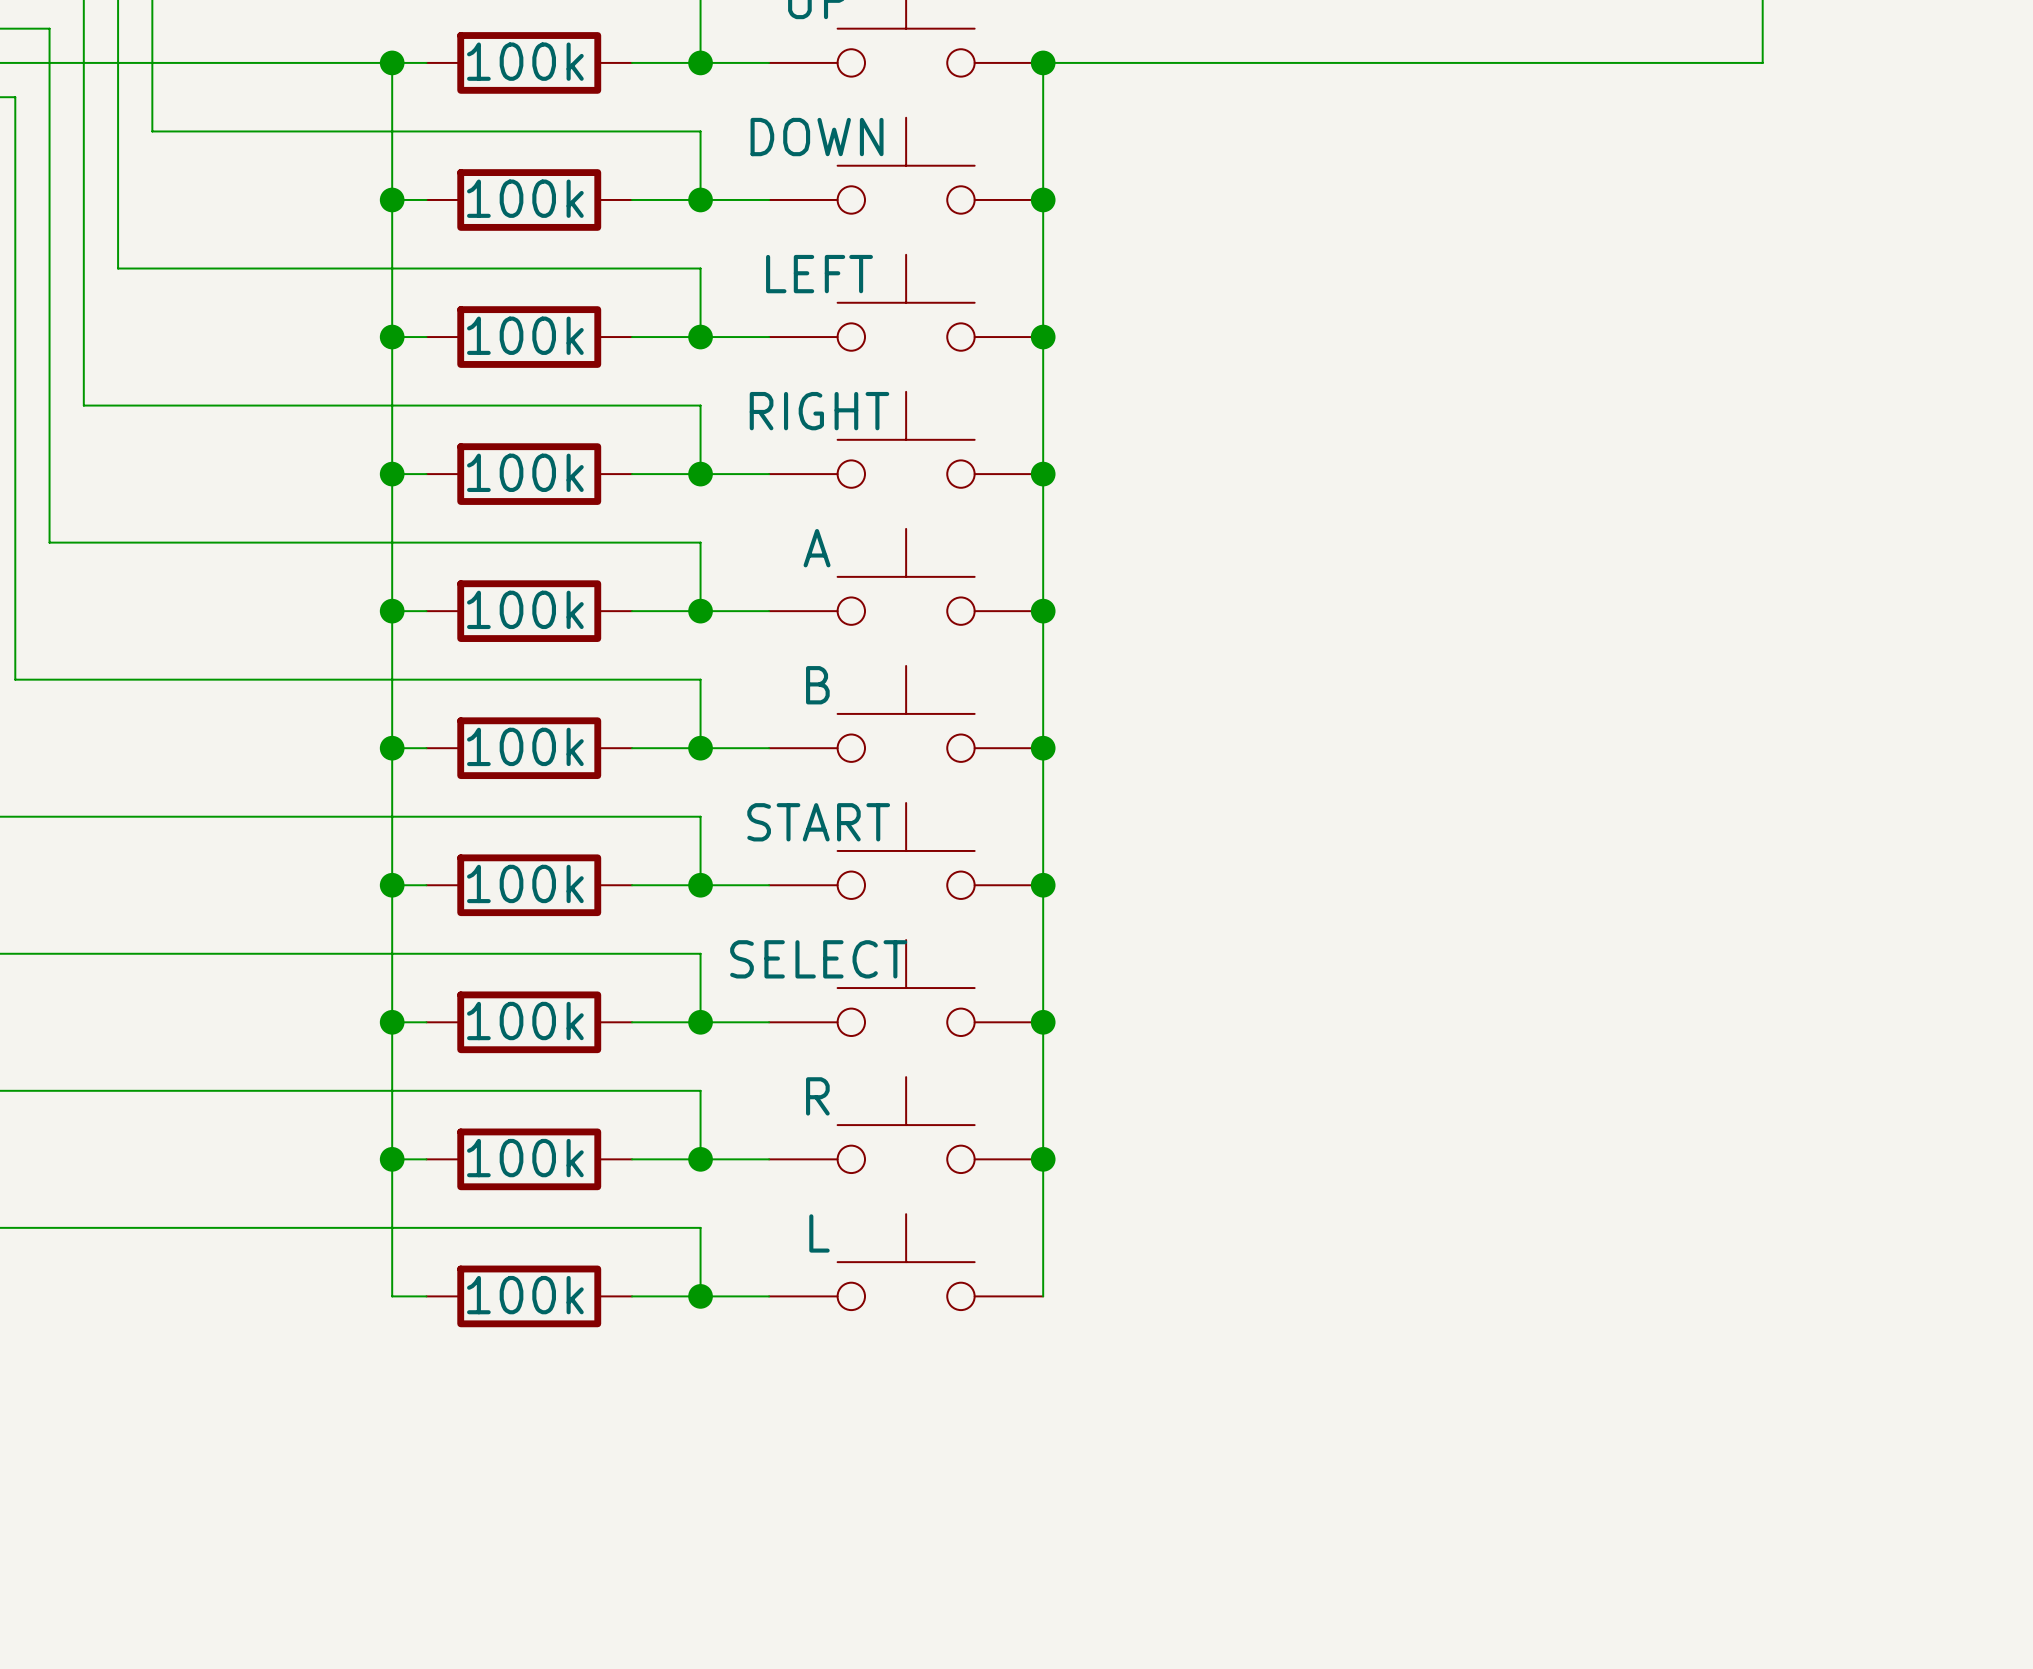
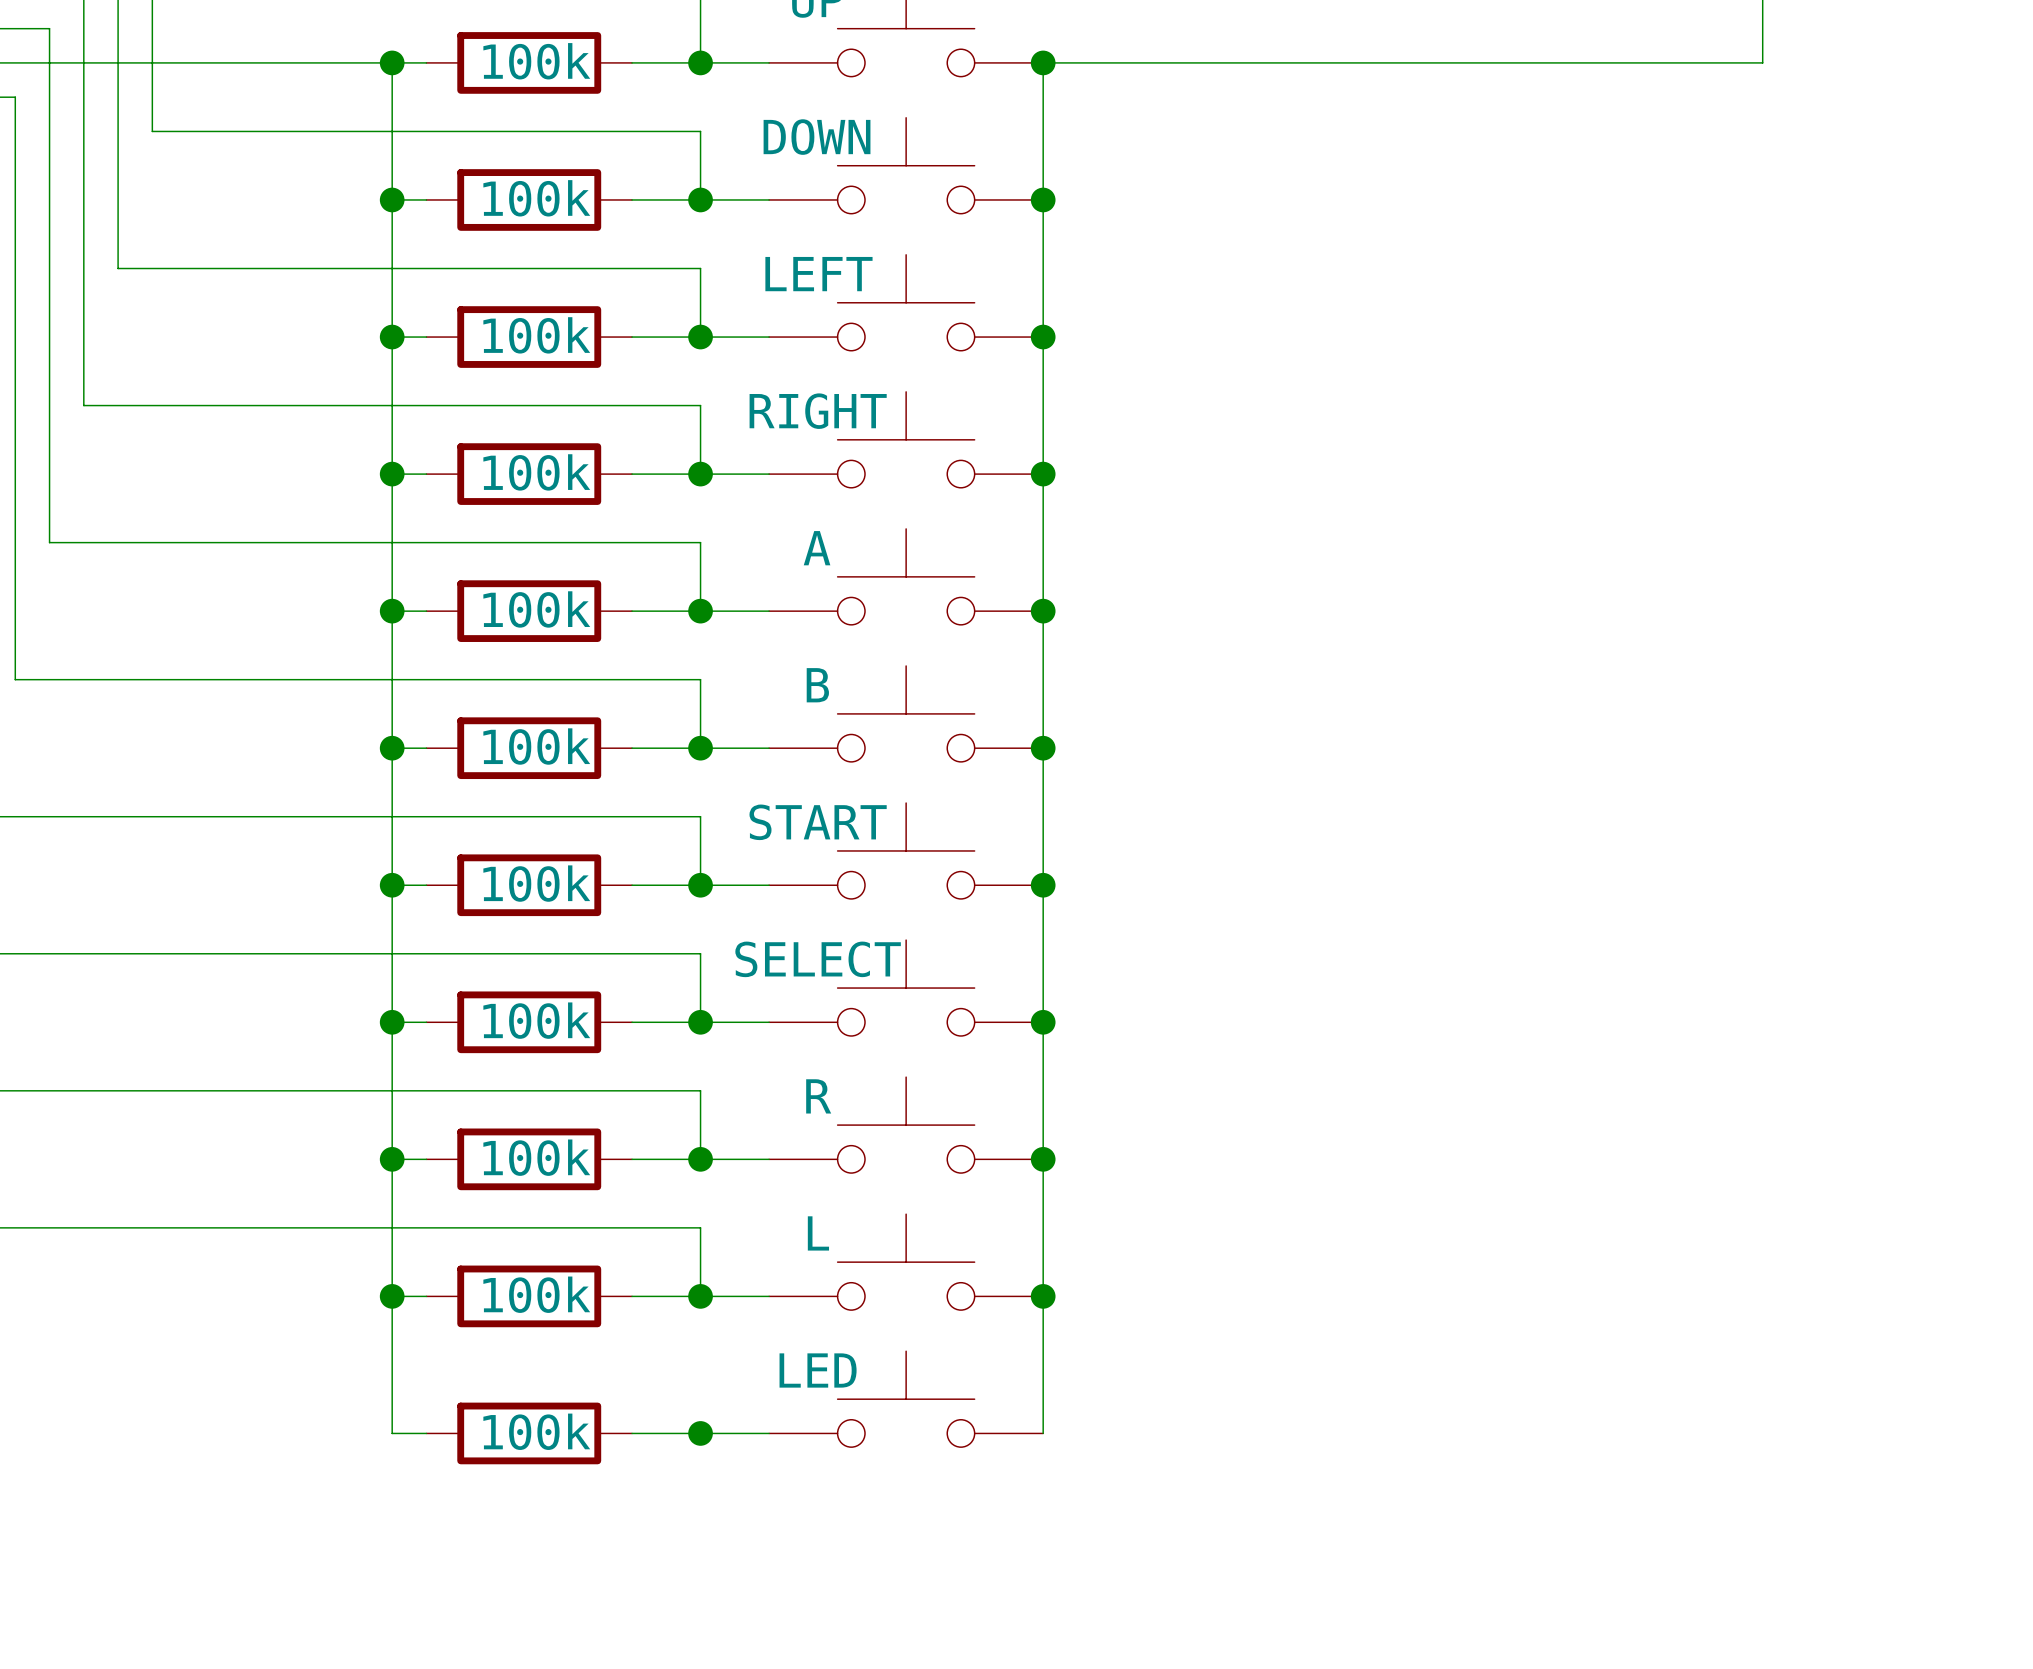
wire: none -> (392, 1296) (392, 1433) (426, 1433)
junction: none -> (392, 1296)
wire: none -> (1043, 1296) (1043, 1433)
junction: none -> (1043, 1296)
part: none -> LED (906, 1399)
part: none -> 100k (529, 1433)
wire: none -> (632, 1433) (769, 1433)
junction: none -> (700, 1433)

